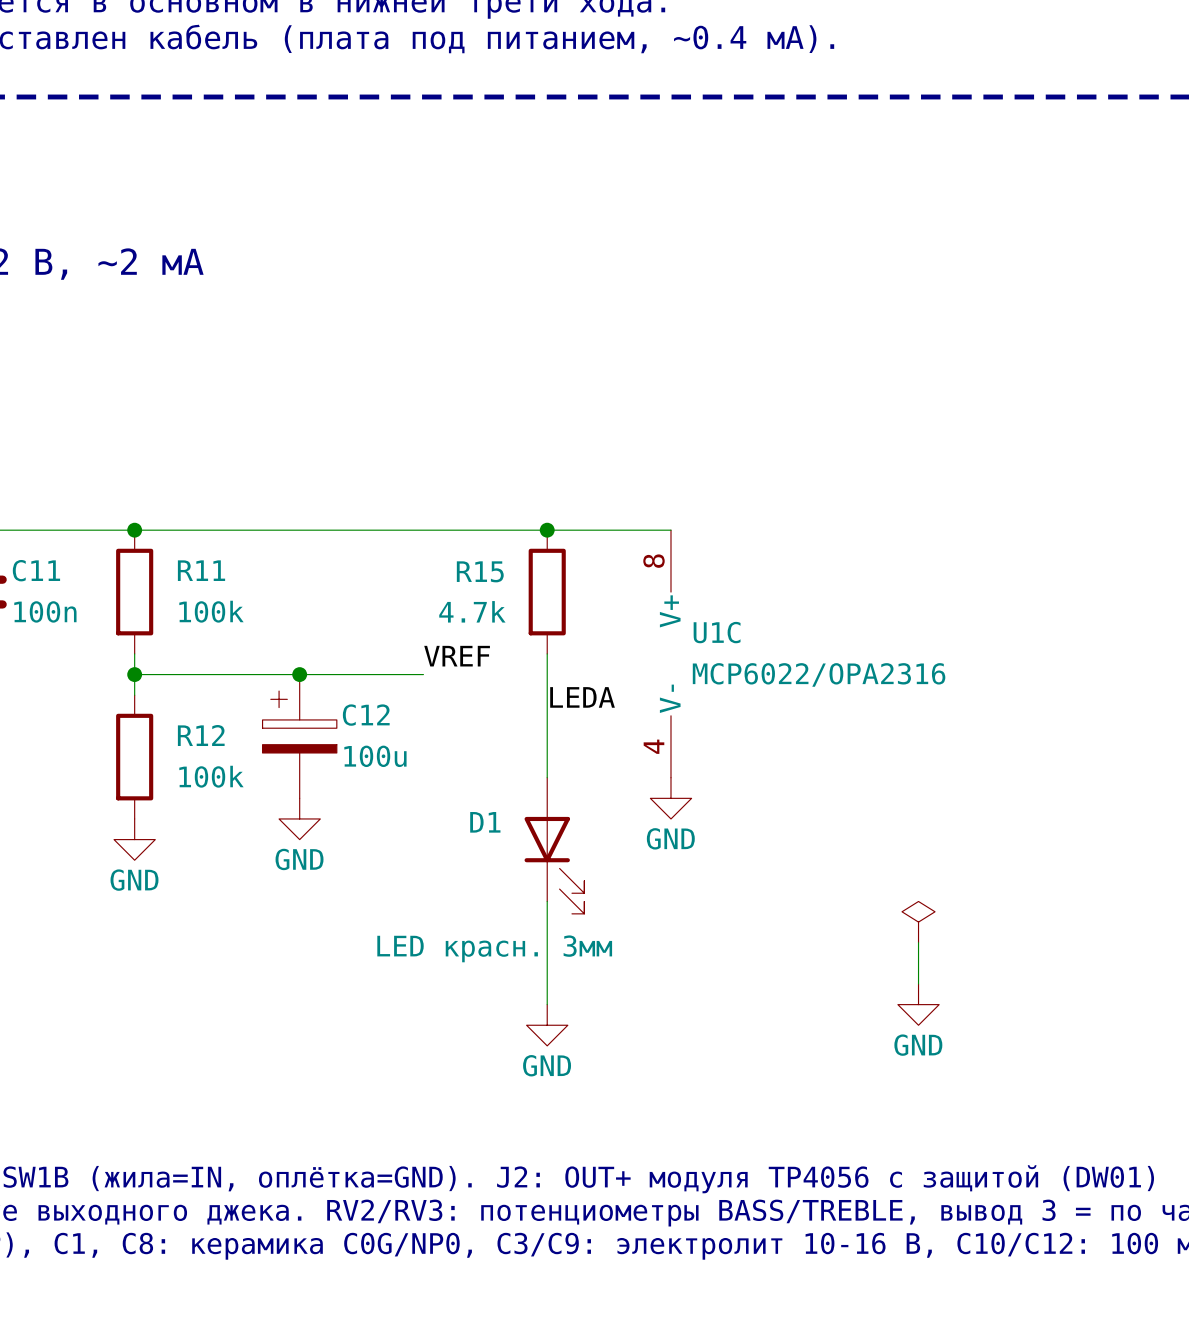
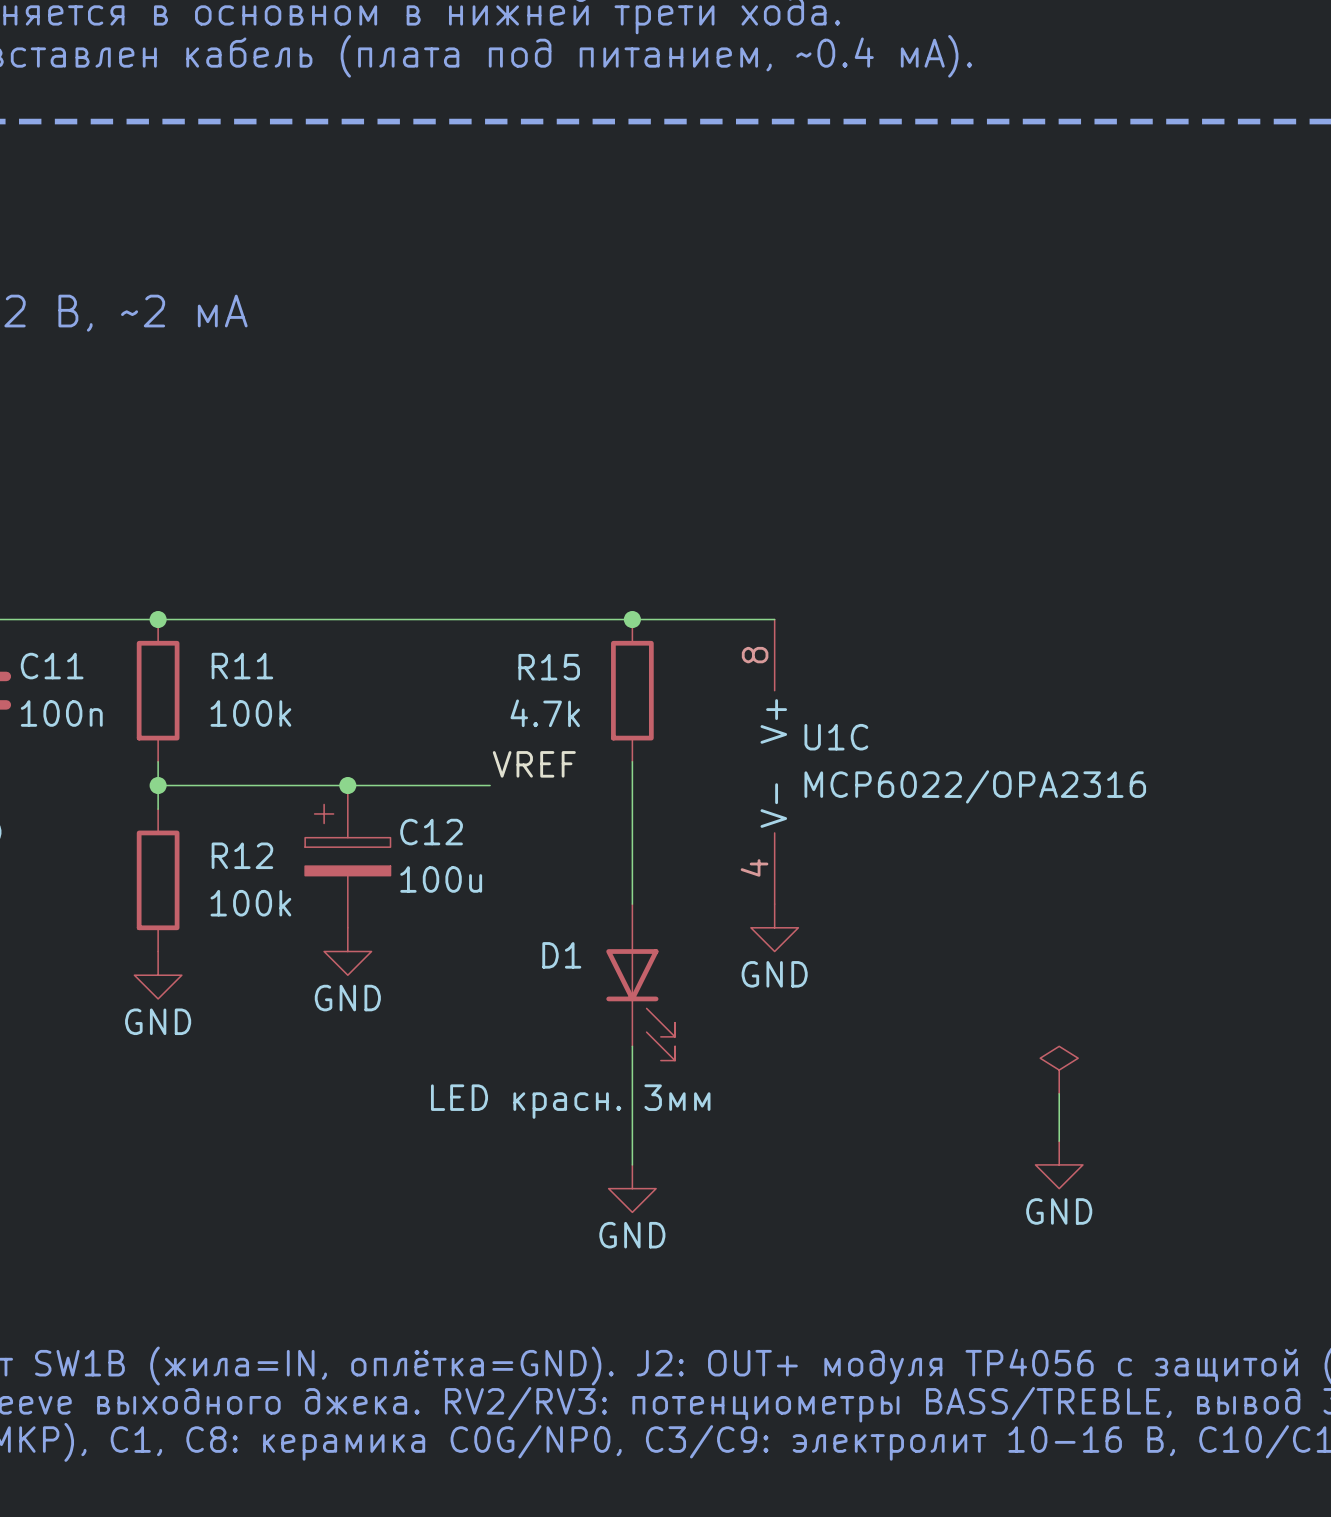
label: LEDA (582, 697) -> none

